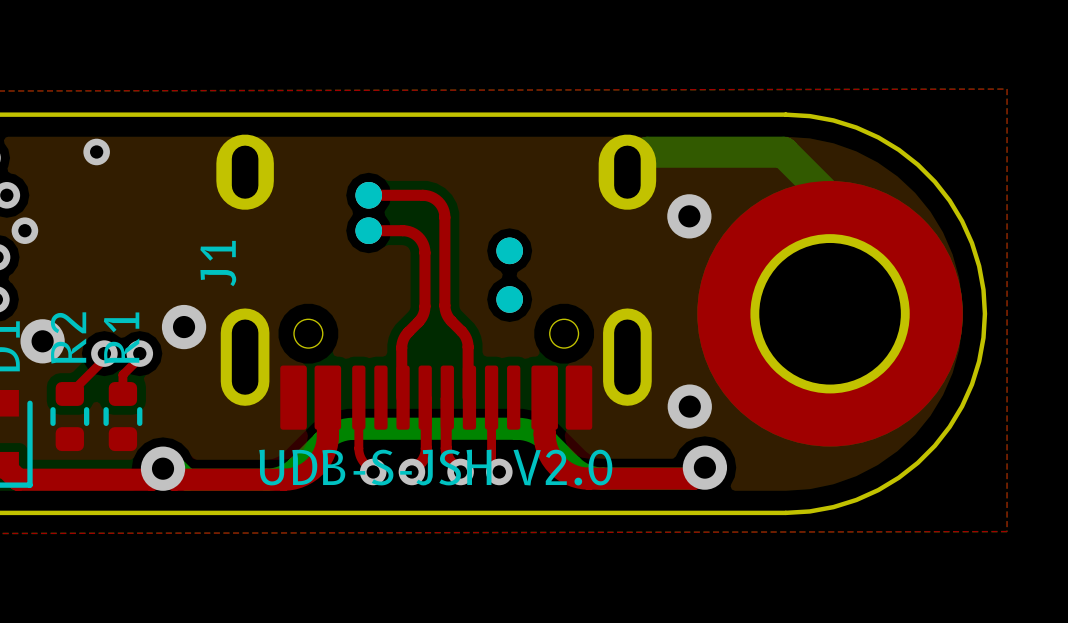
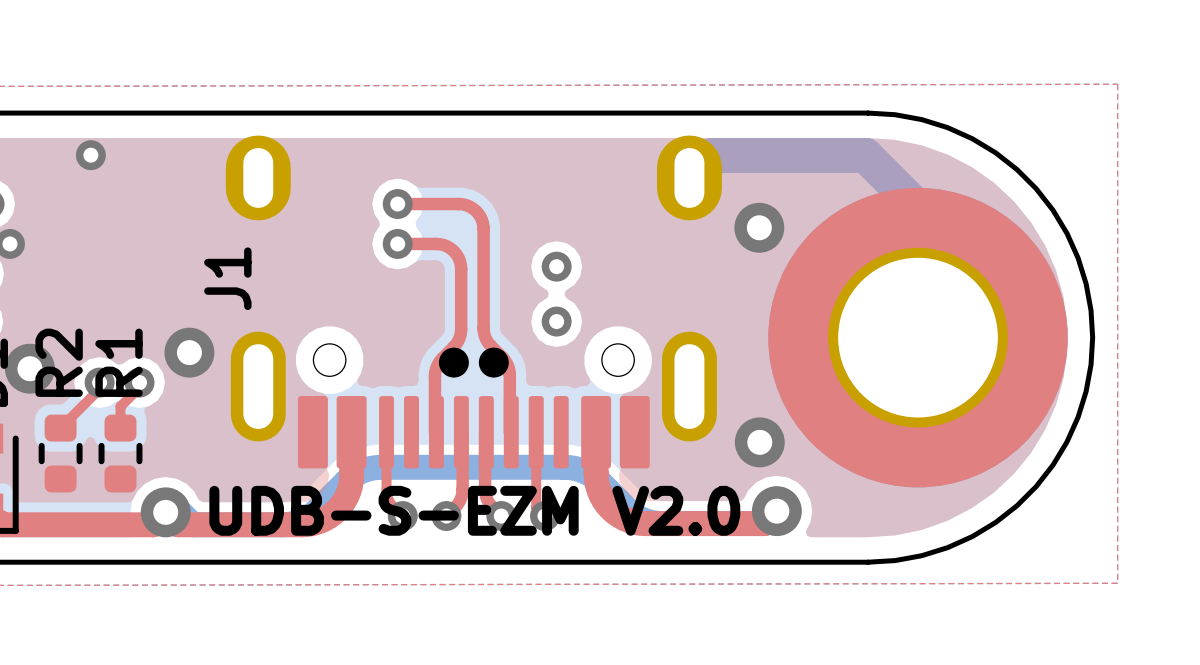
drawing: [355, 182, 383, 244] -> none
drawing: [496, 237, 523, 313] -> none
drawing: none -> [438, 347, 509, 378]
text: UDB-S-JSH V2.0 (435, 467) -> UDB-S-EZM V2.0 (474, 510)

